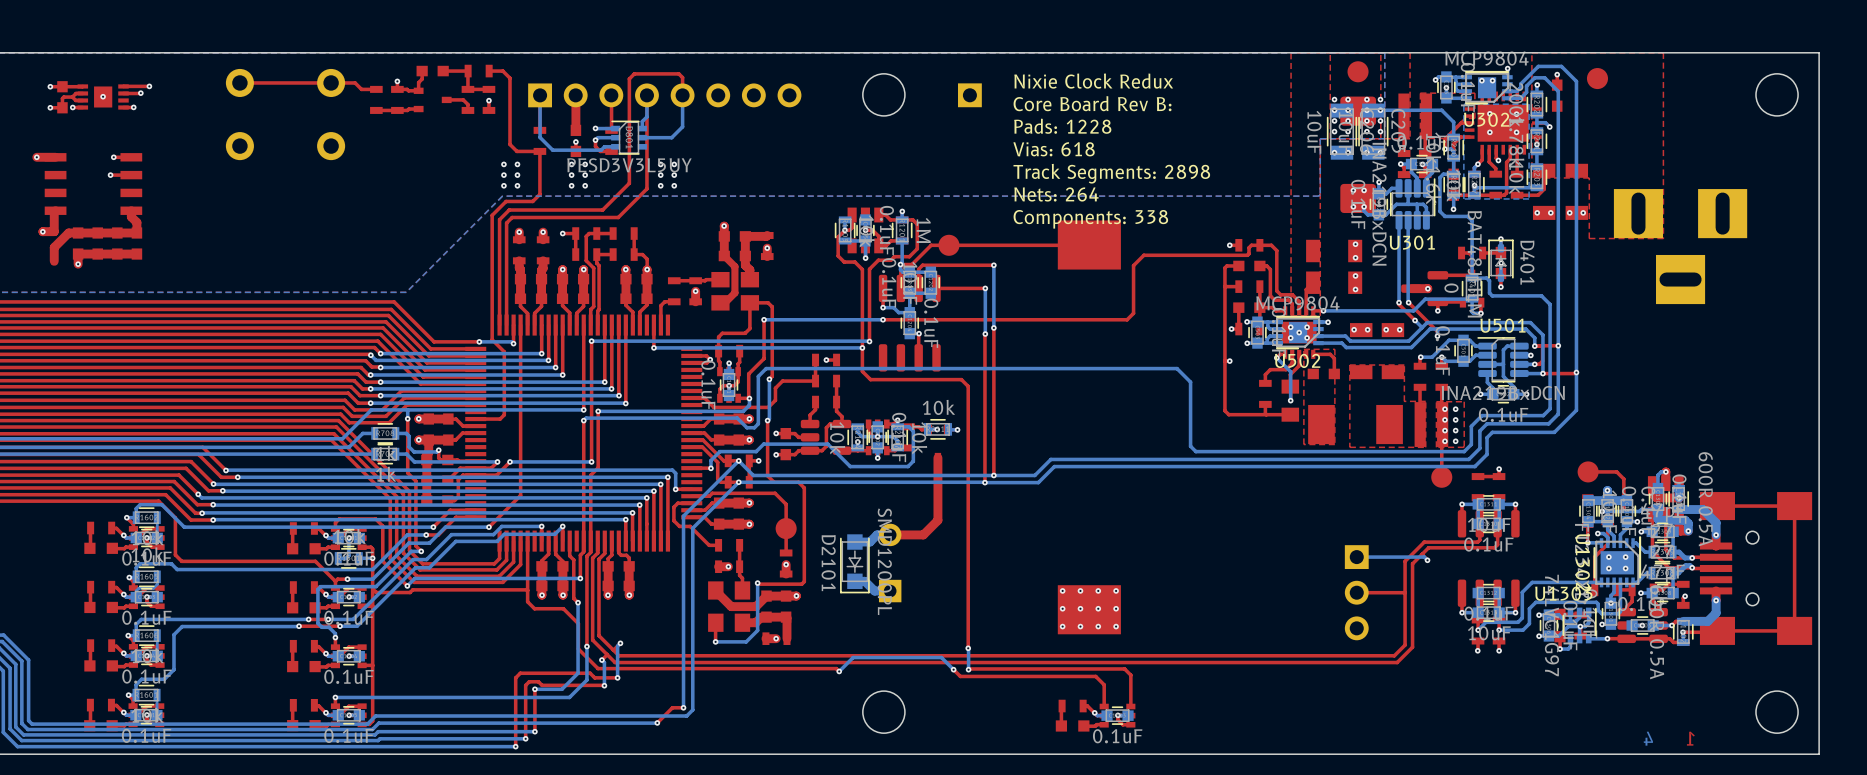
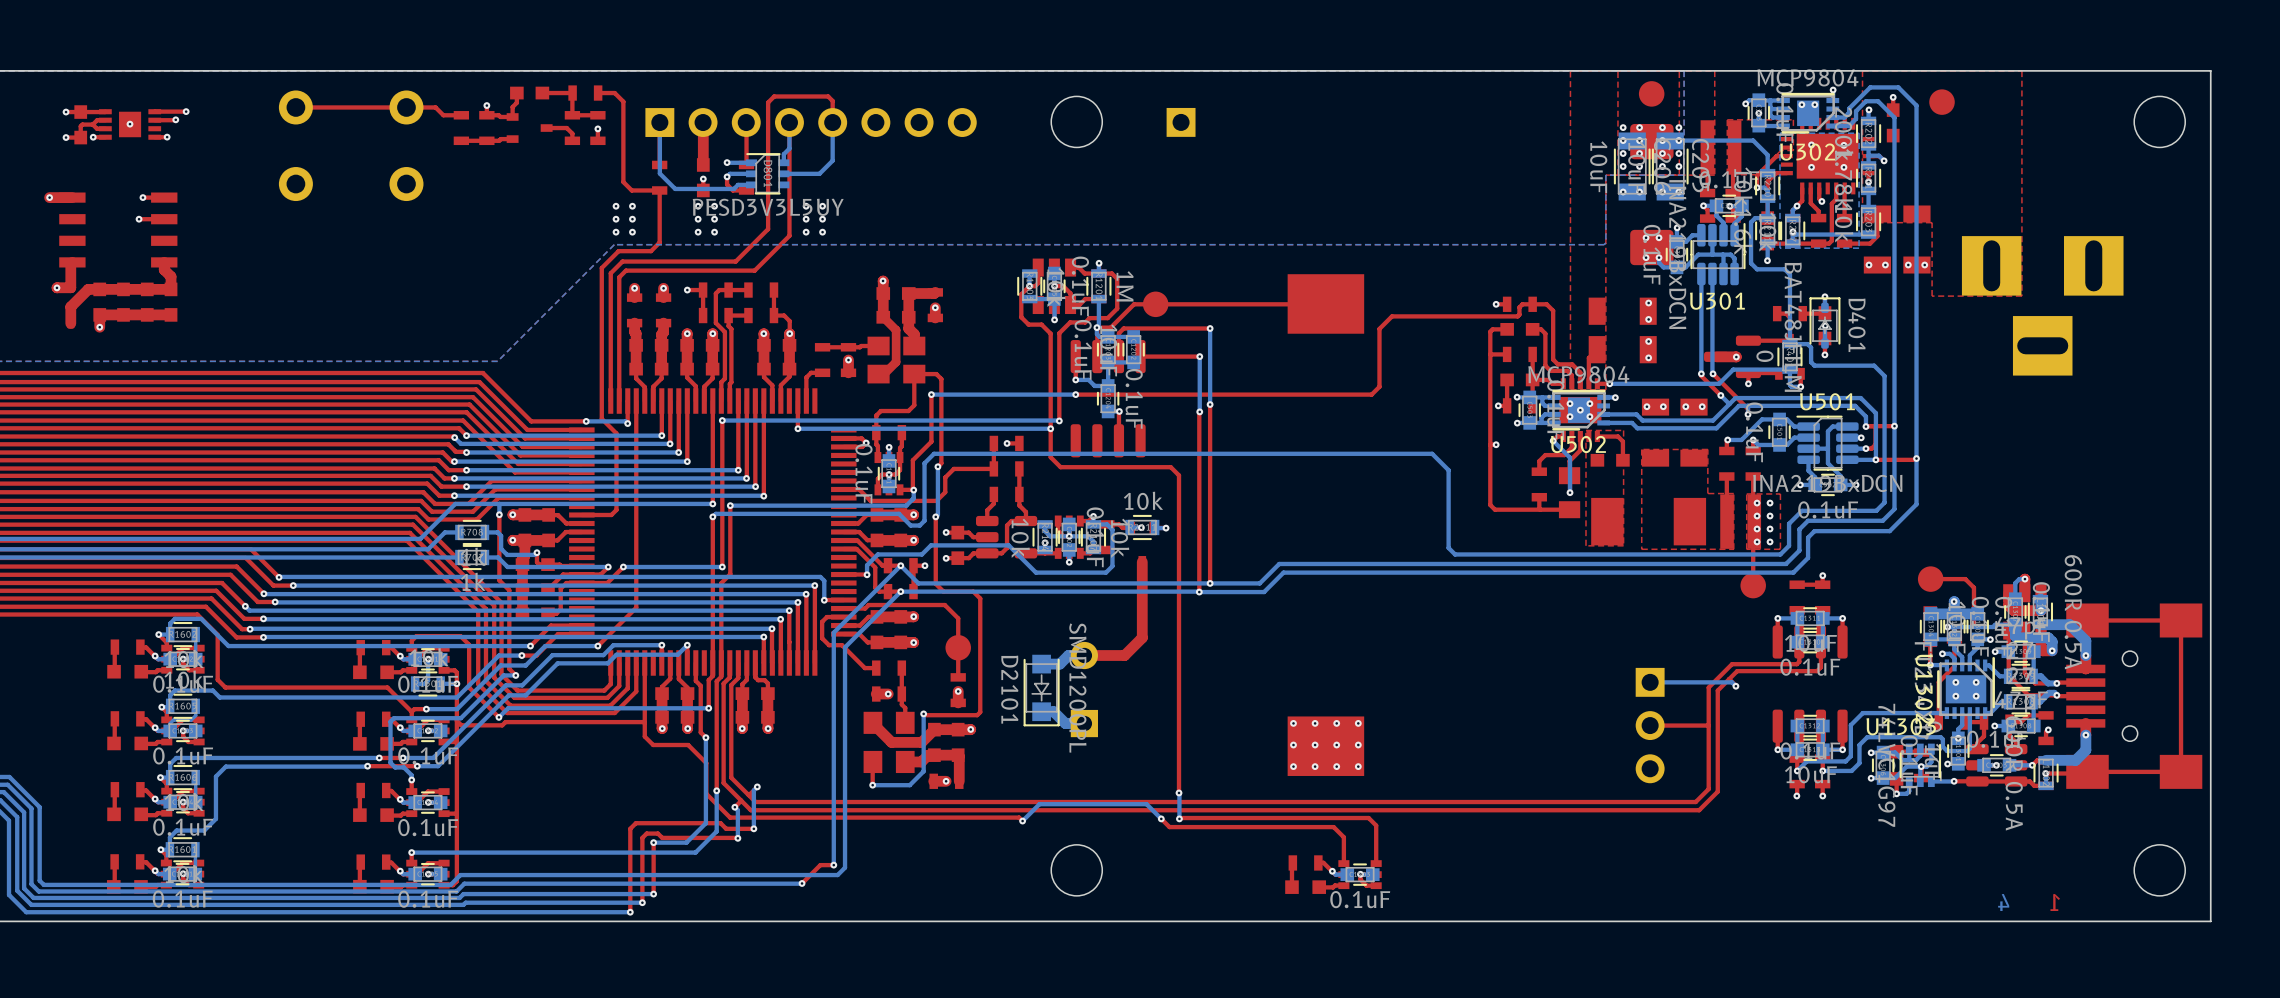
text: Nixie Clock Redux (1093, 81) -> none
text: Core Board Rev B: (1092, 103) -> none
text: Pads: 1228 (1062, 126) -> none
text: Vias: 618 (1054, 149) -> none
text: Track Segments: 2898 (1111, 173) -> none
text: Nets: 264 (1056, 194) -> none
text: Components: 338 (1090, 219) -> none

